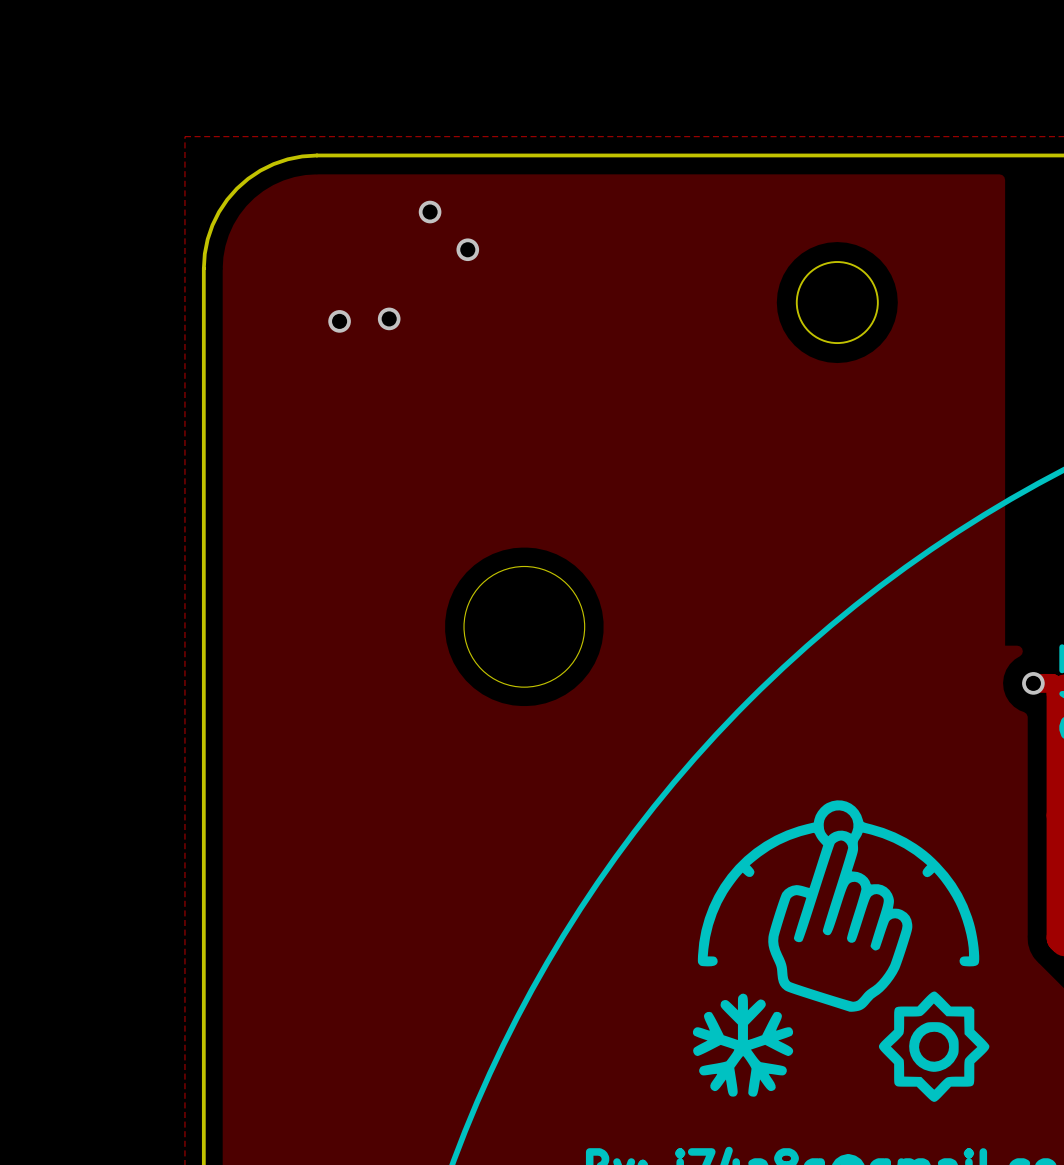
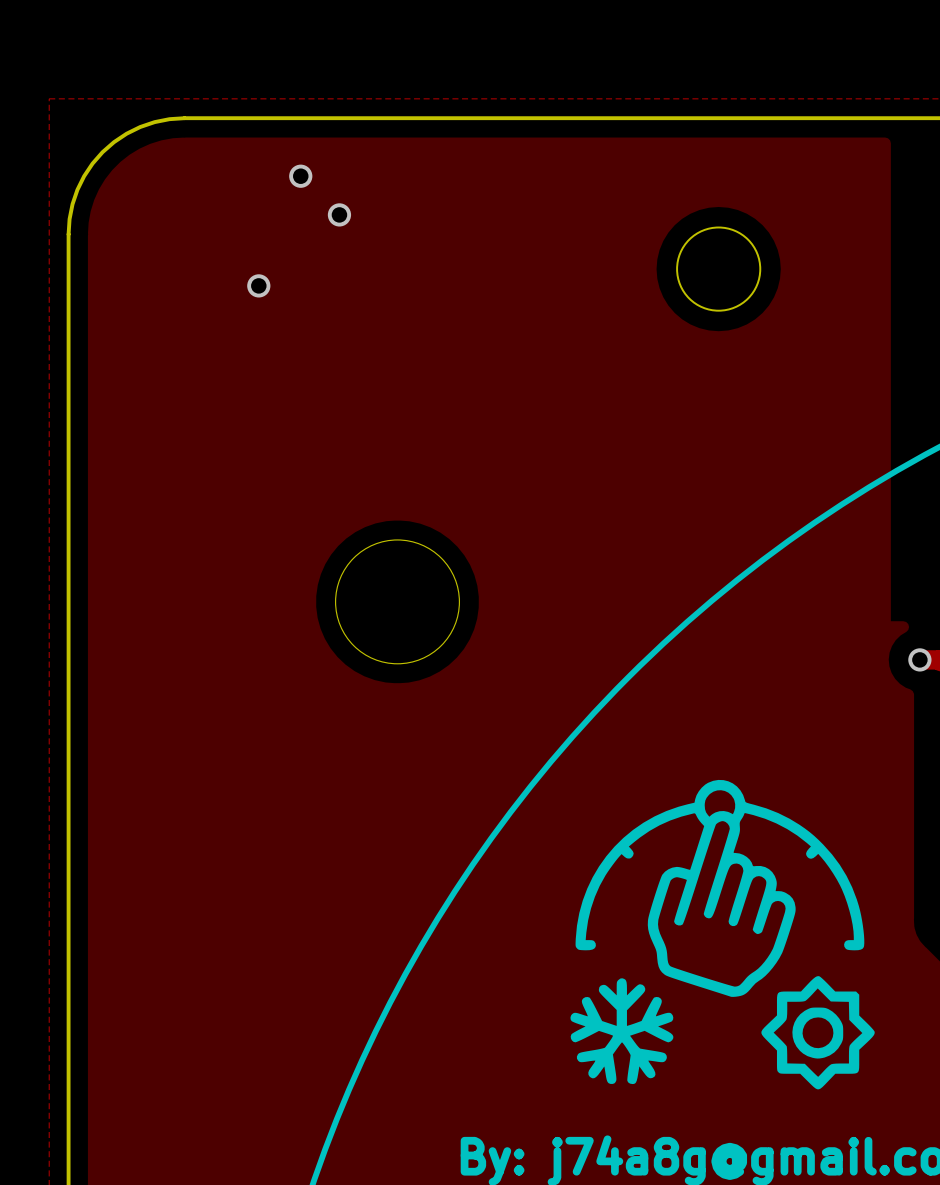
via: (339, 321) -> none

